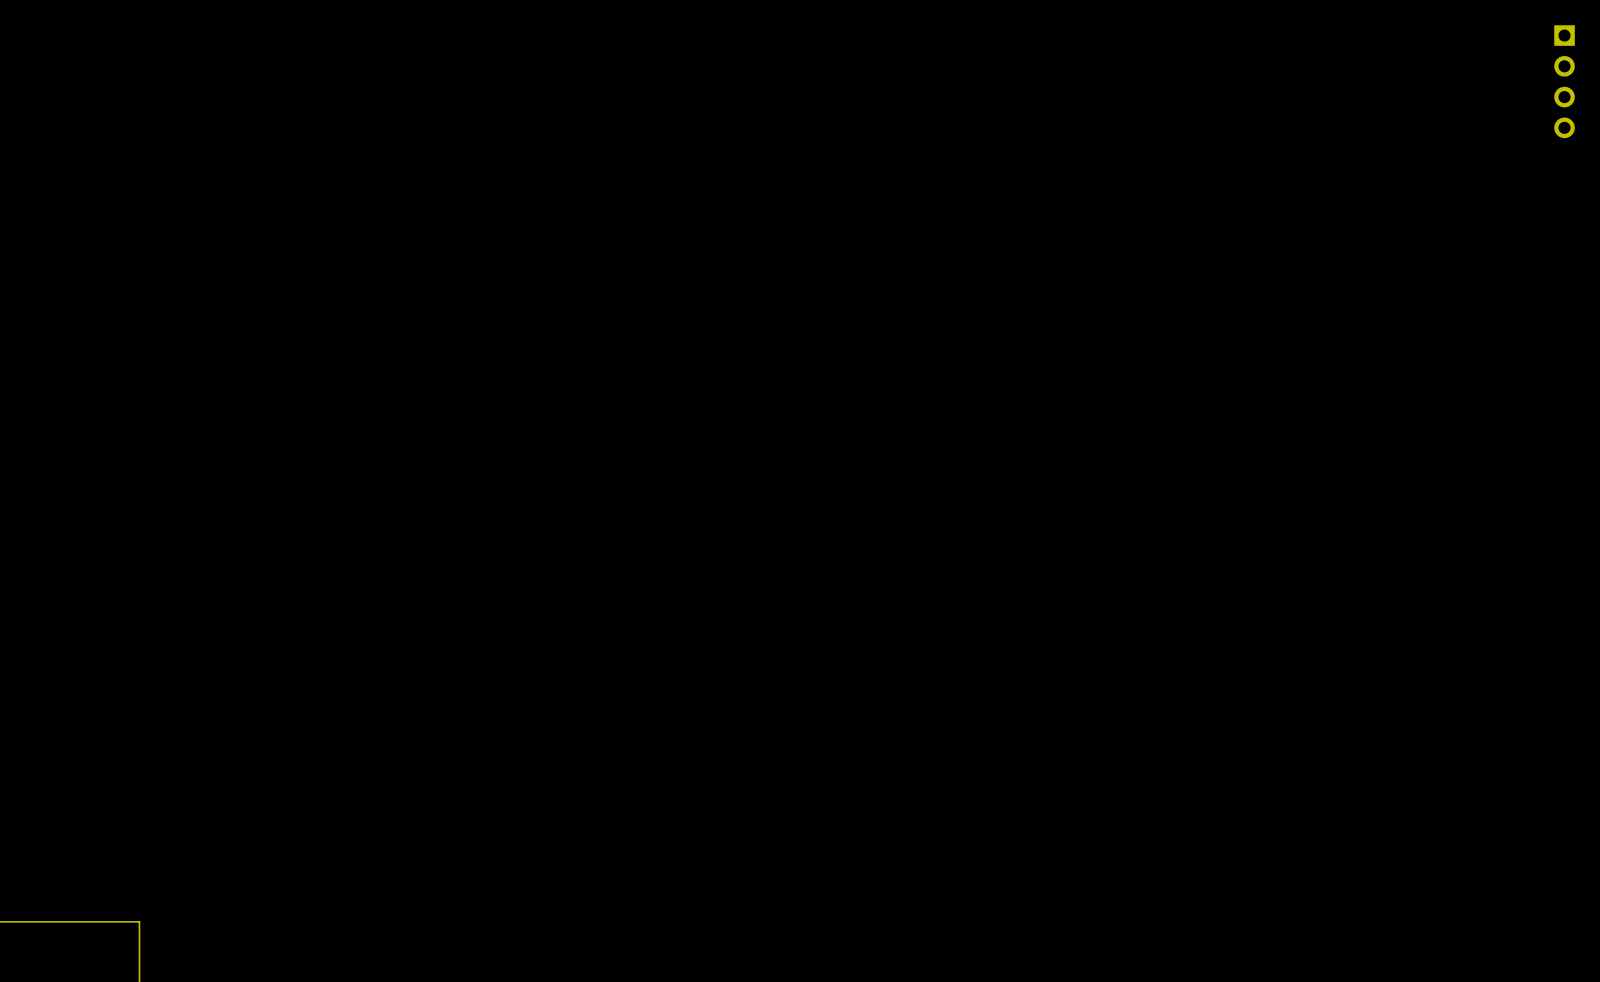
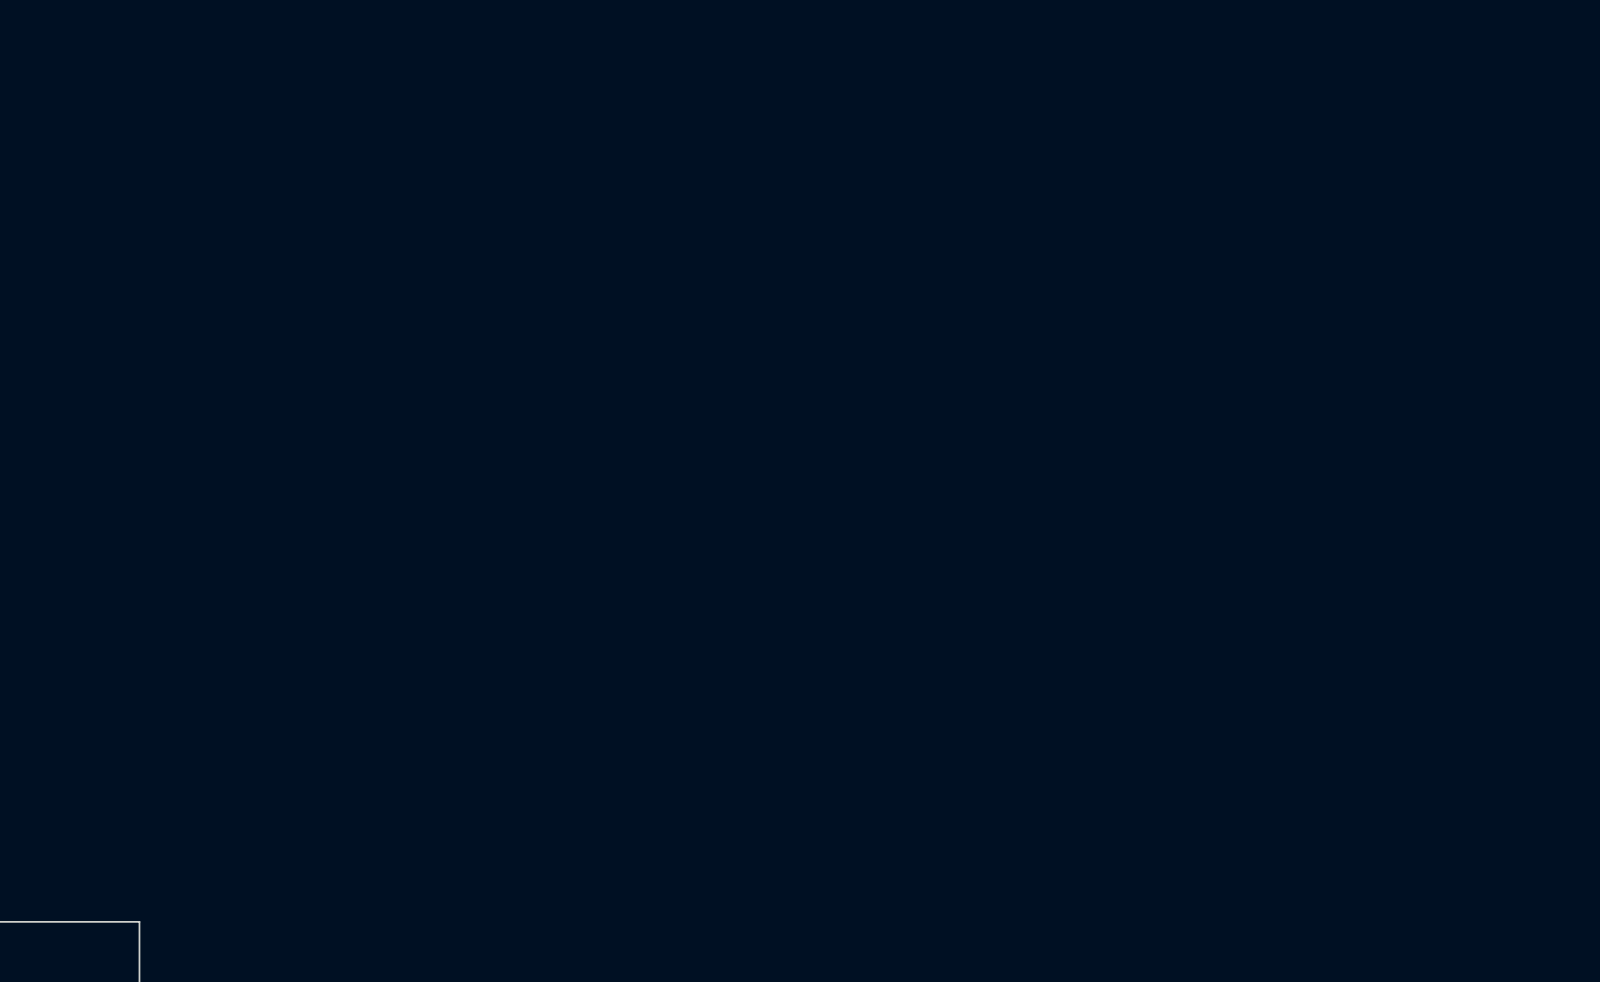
part: (1564, 81) -> none

